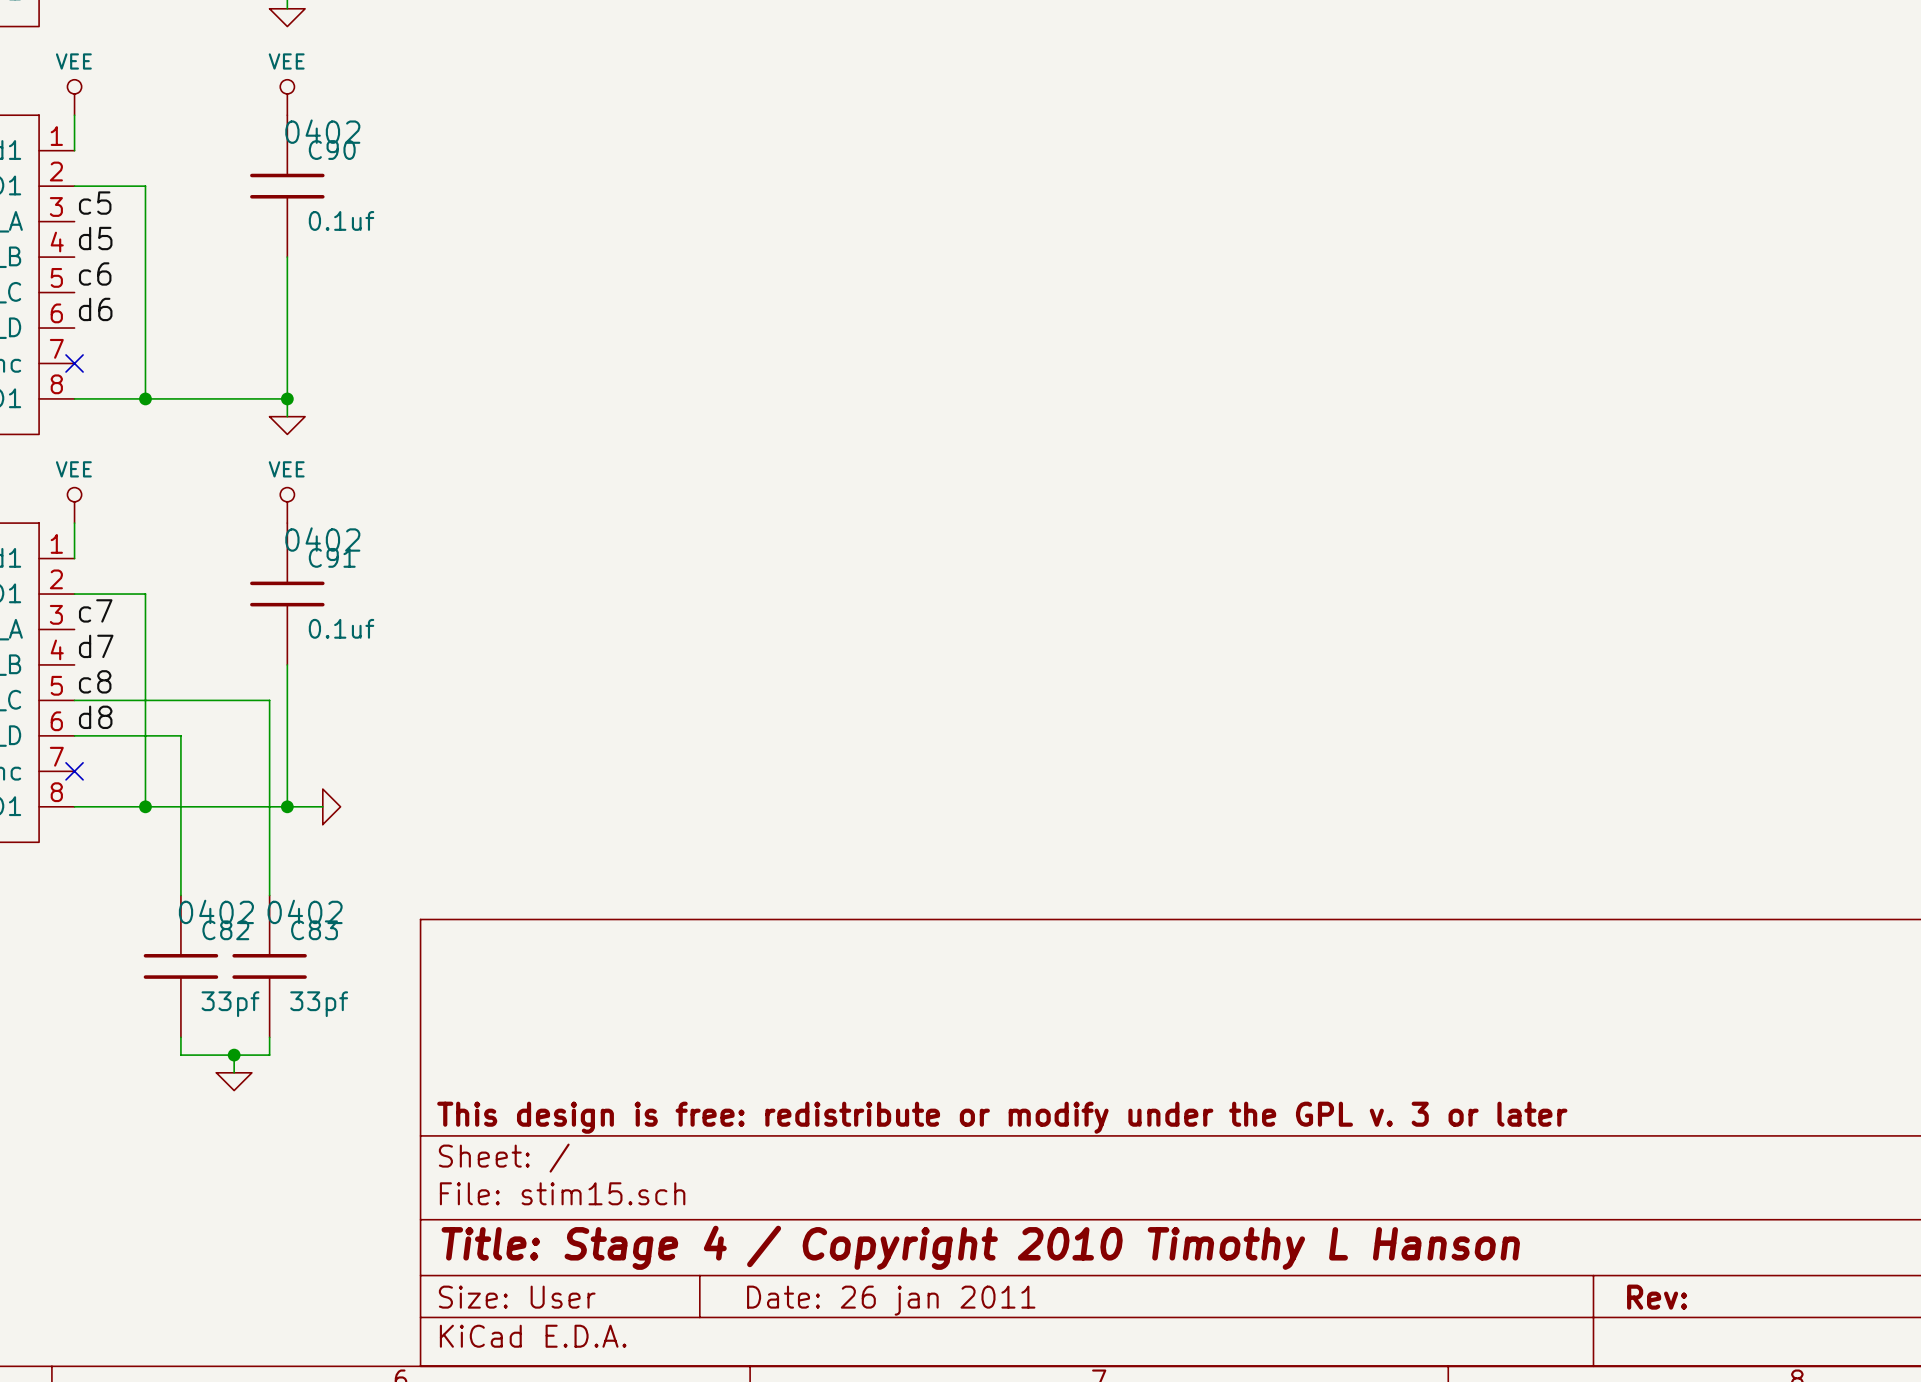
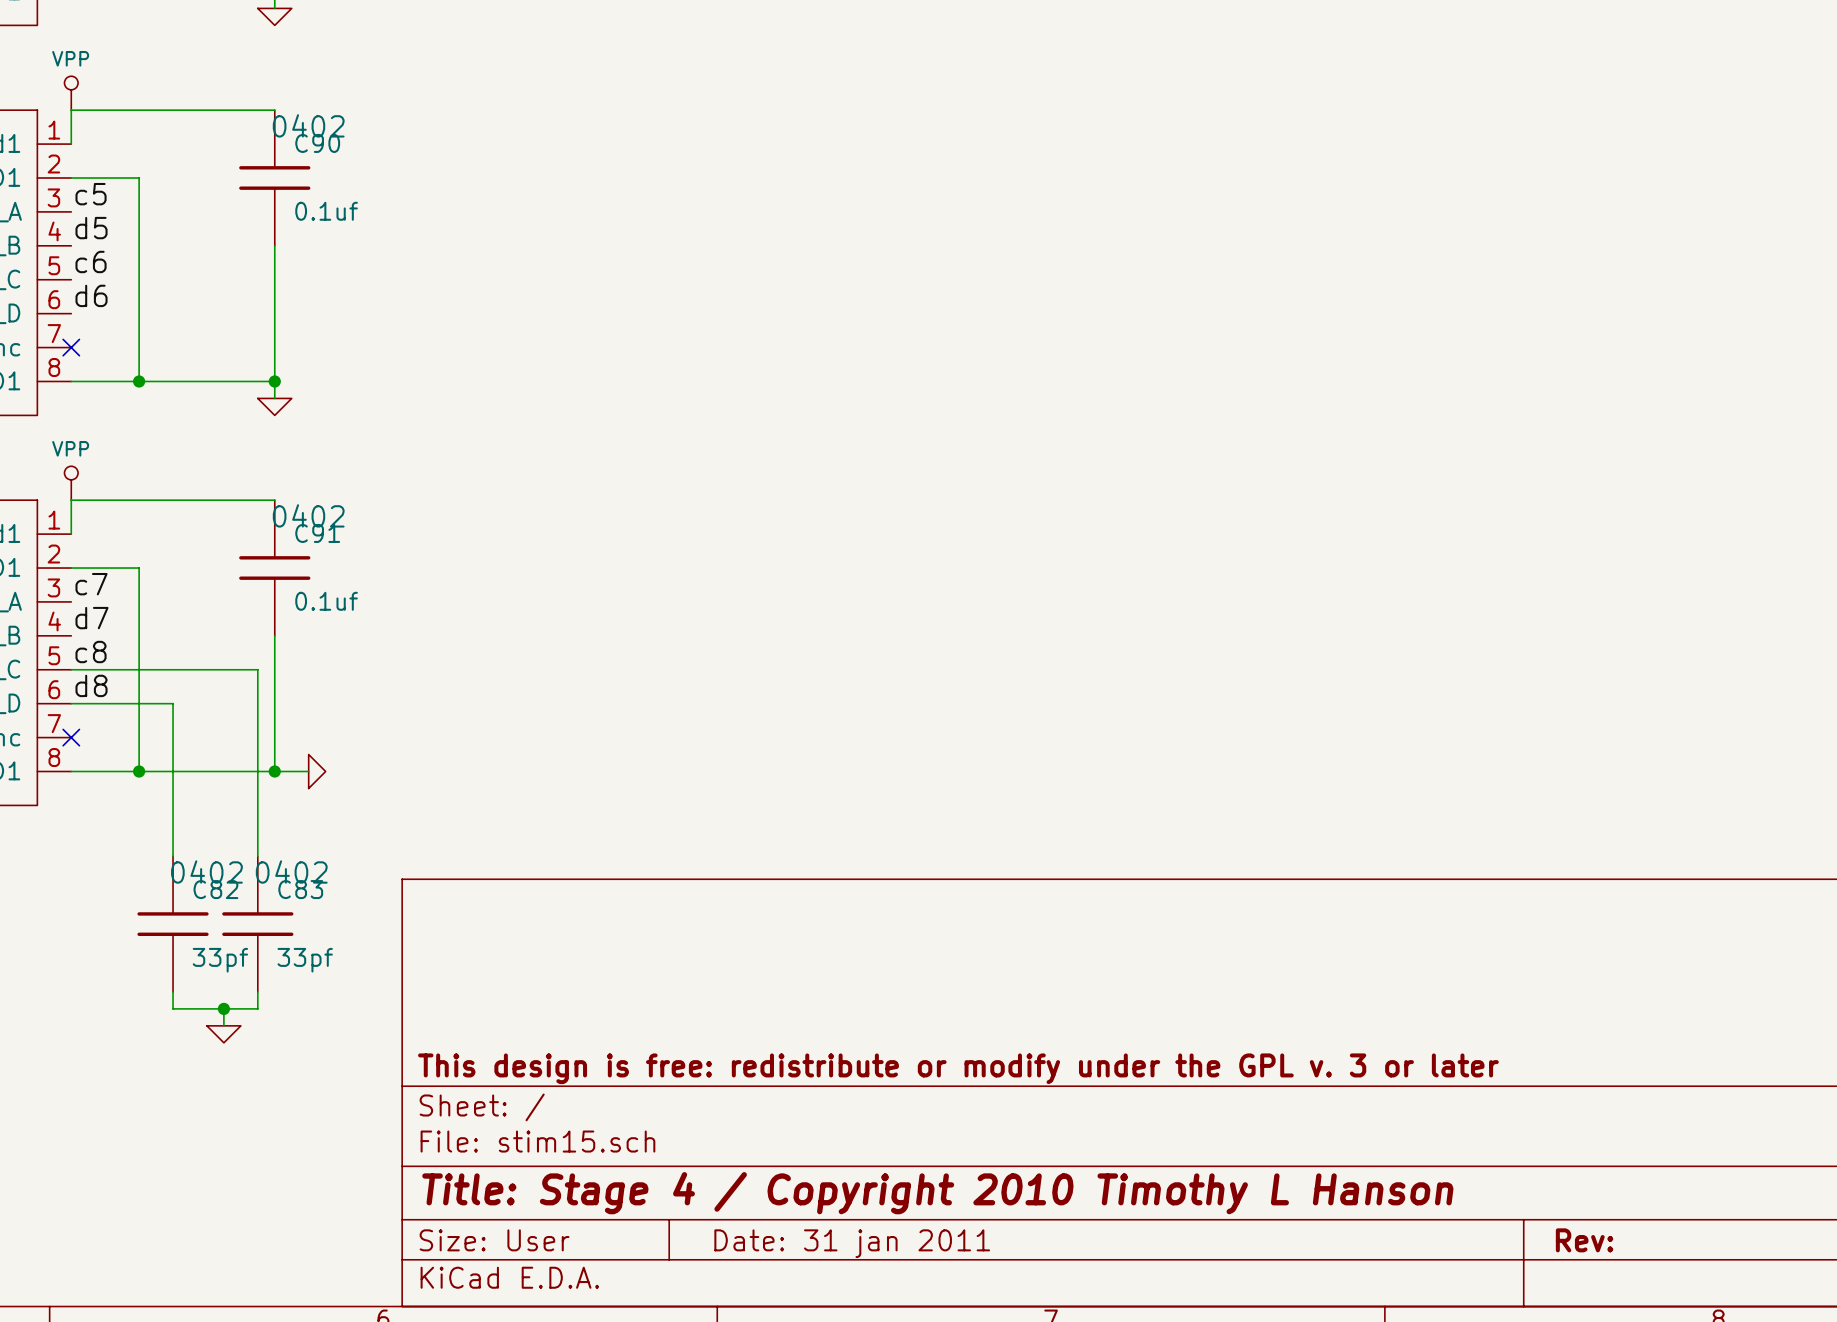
power symbol: VEE (74, 97) -> VPP (71, 93)
power symbol: VEE (287, 97) -> none
wire: none -> (71, 110) (274, 110)
power symbol: VEE (74, 505) -> VPP (71, 483)
power symbol: VEE (287, 505) -> none
wire: none -> (71, 500) (274, 500)
title block: Date: 26 jan 2011 (891, 1300) -> Date: 31 jan 2011 (852, 1243)

